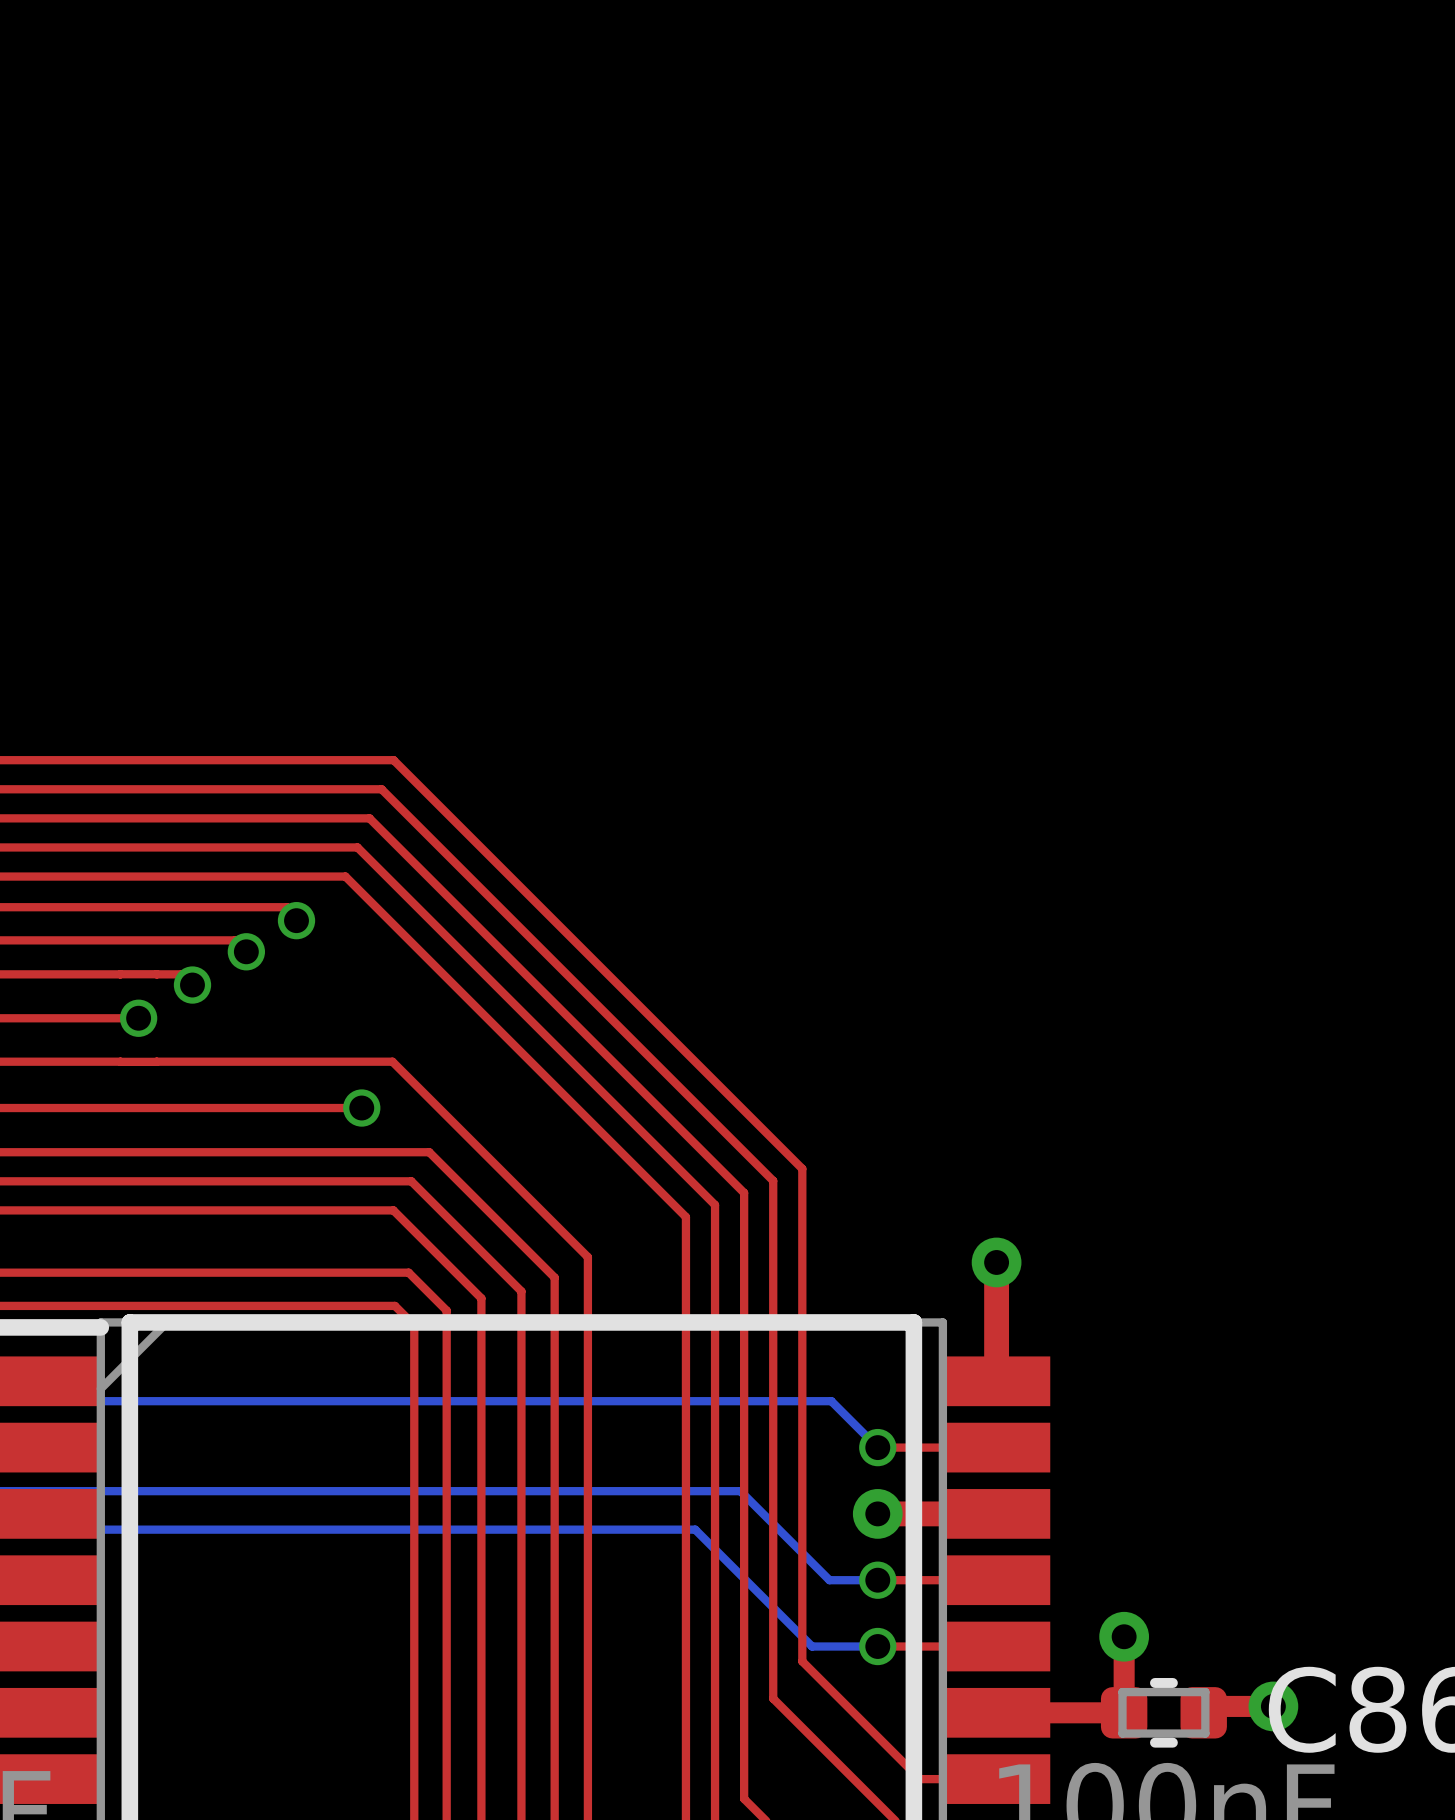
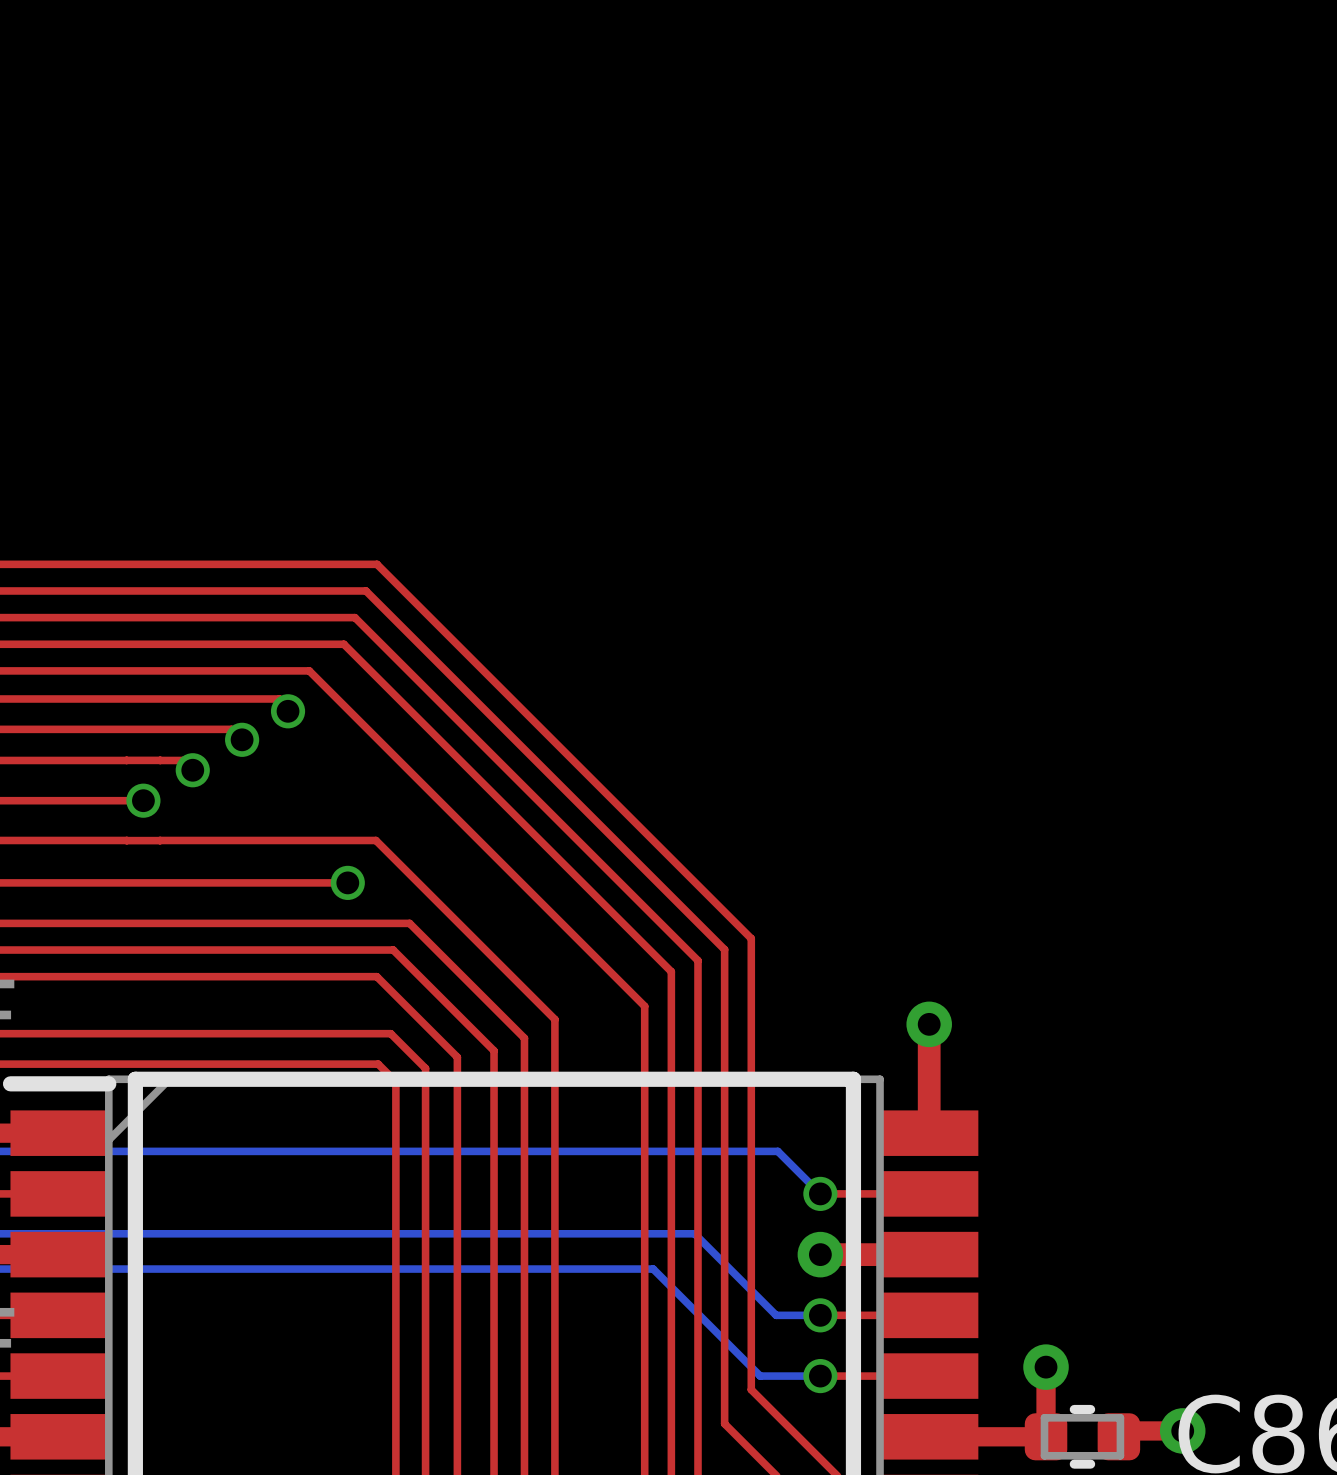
top track: (319, 876) (345, 876) (685, 1217) (685, 1242) -> (309, 670) (644, 1006)

